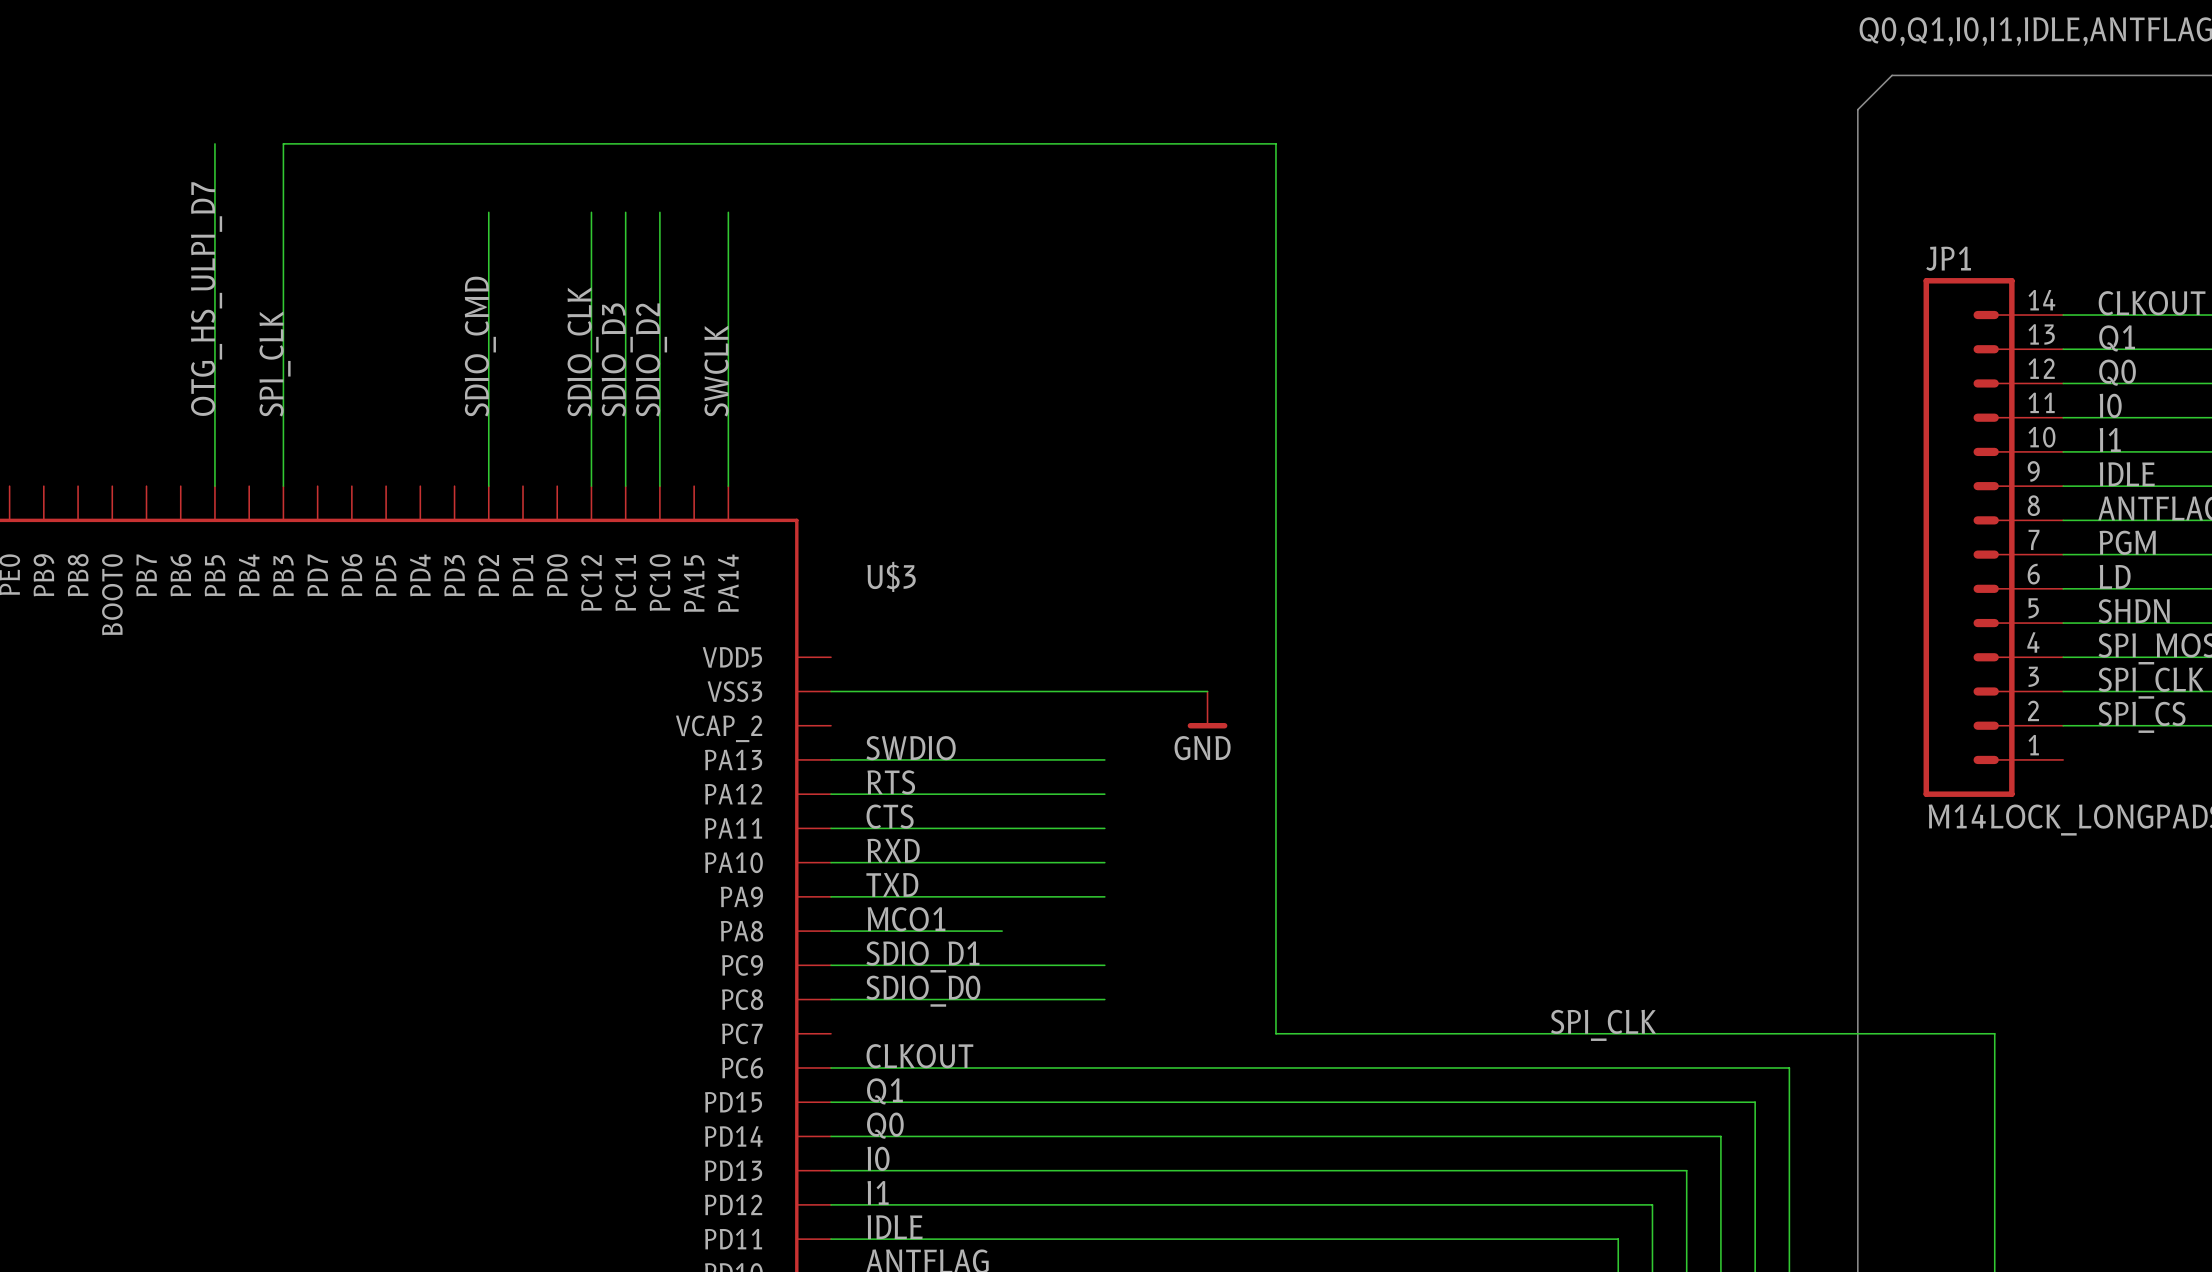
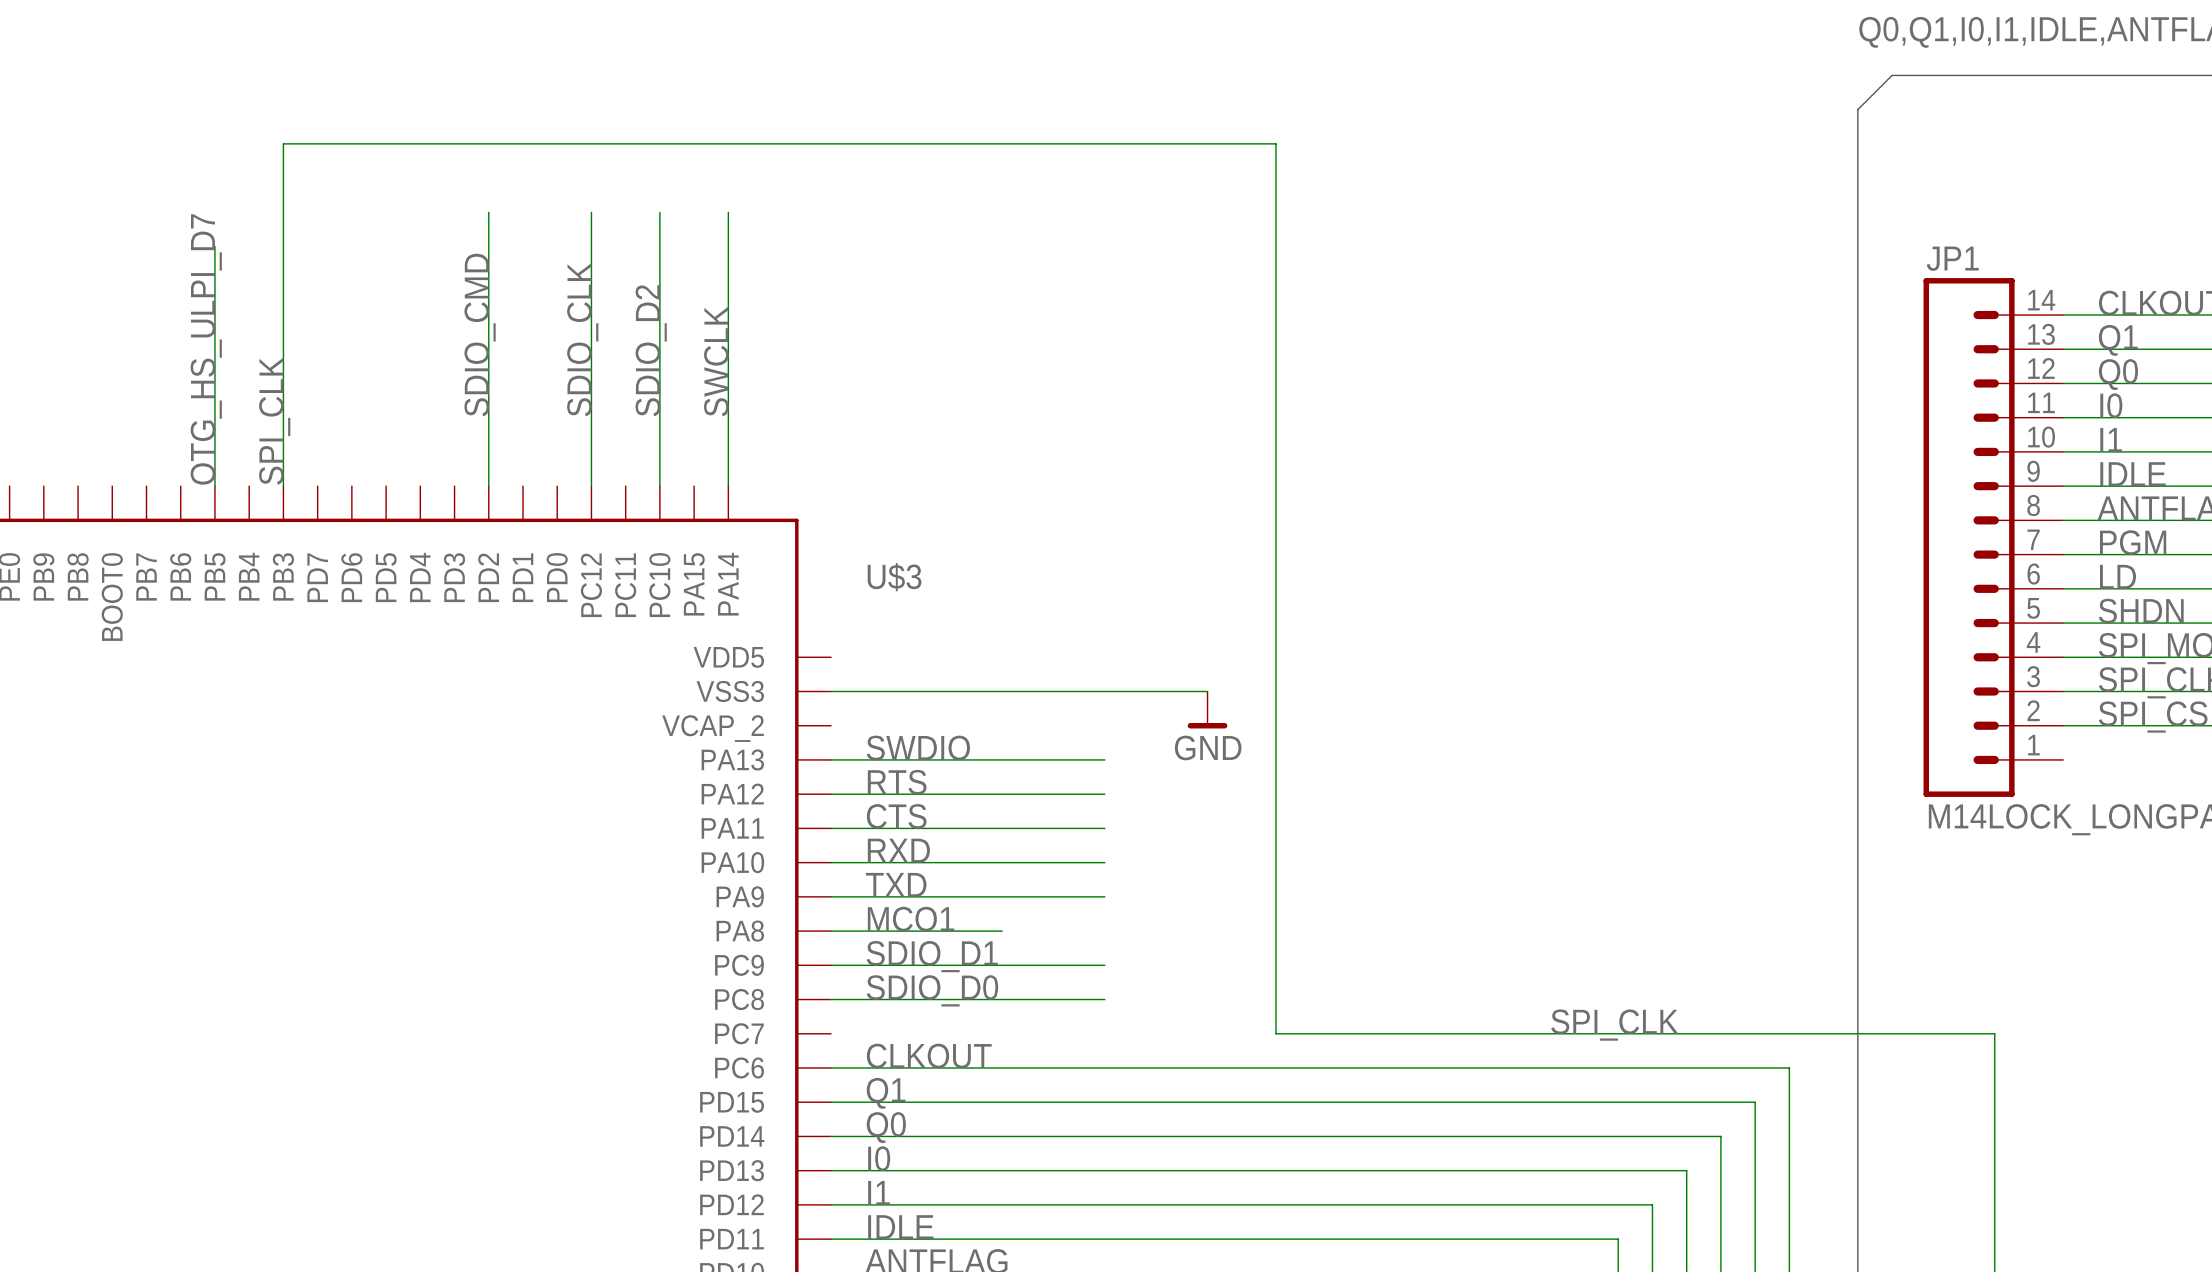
wire: (214, 143) (214, 246) -> none
wire: (625, 212) (625, 486) -> none
label position: OTG_HS_ULPI_D7 (206, 299) -> OTG_HS_ULPI_D7 (206, 349)
label: SDIO_D3 (617, 359) -> none
label position: SPI_CLK (275, 363) -> SPI_CLK (274, 421)

